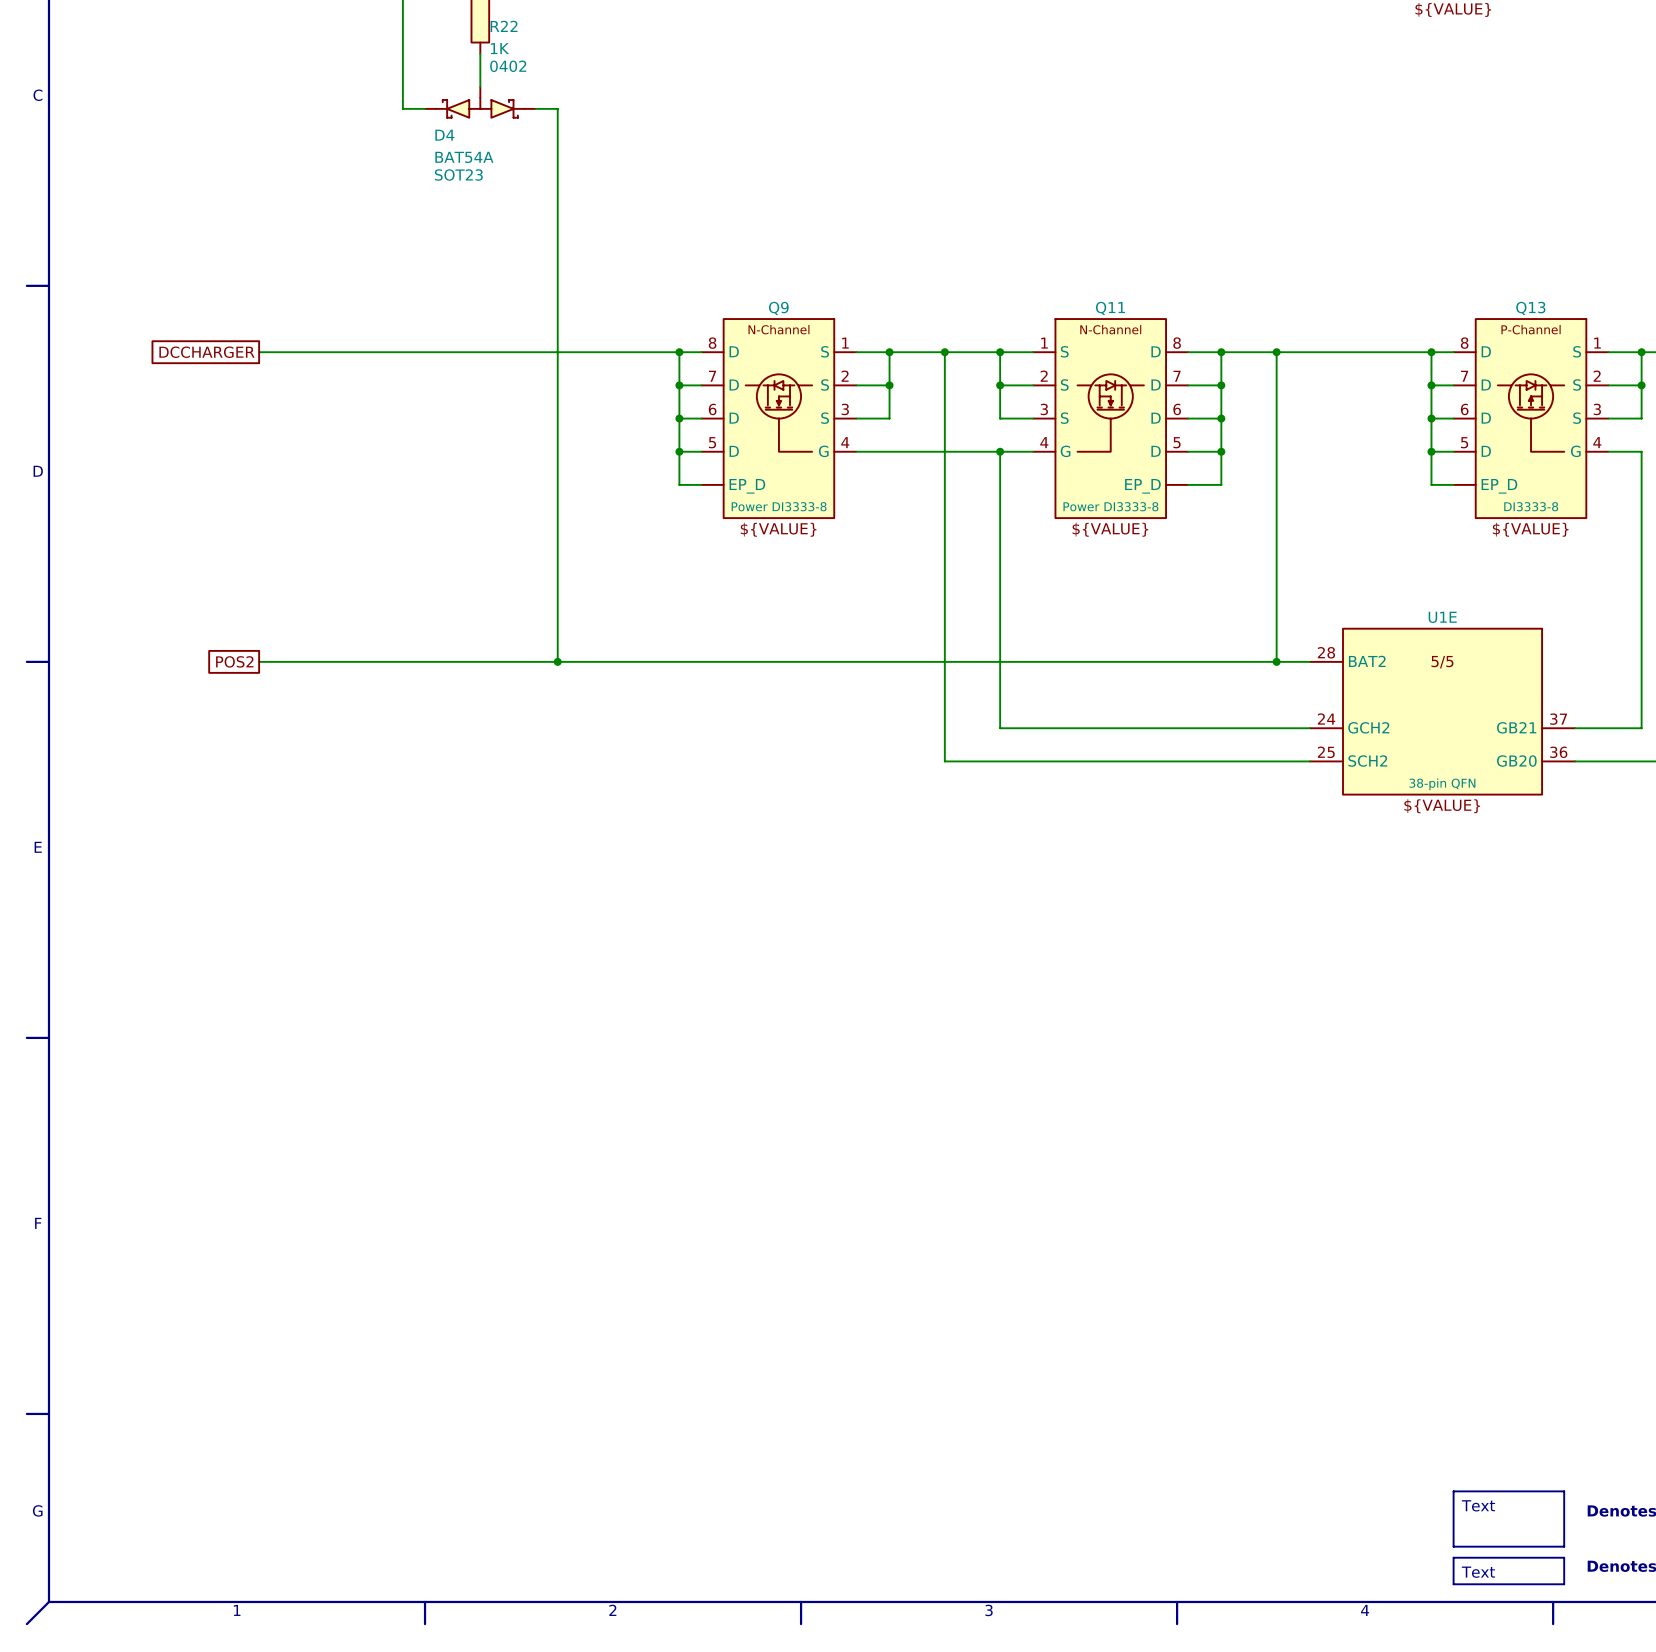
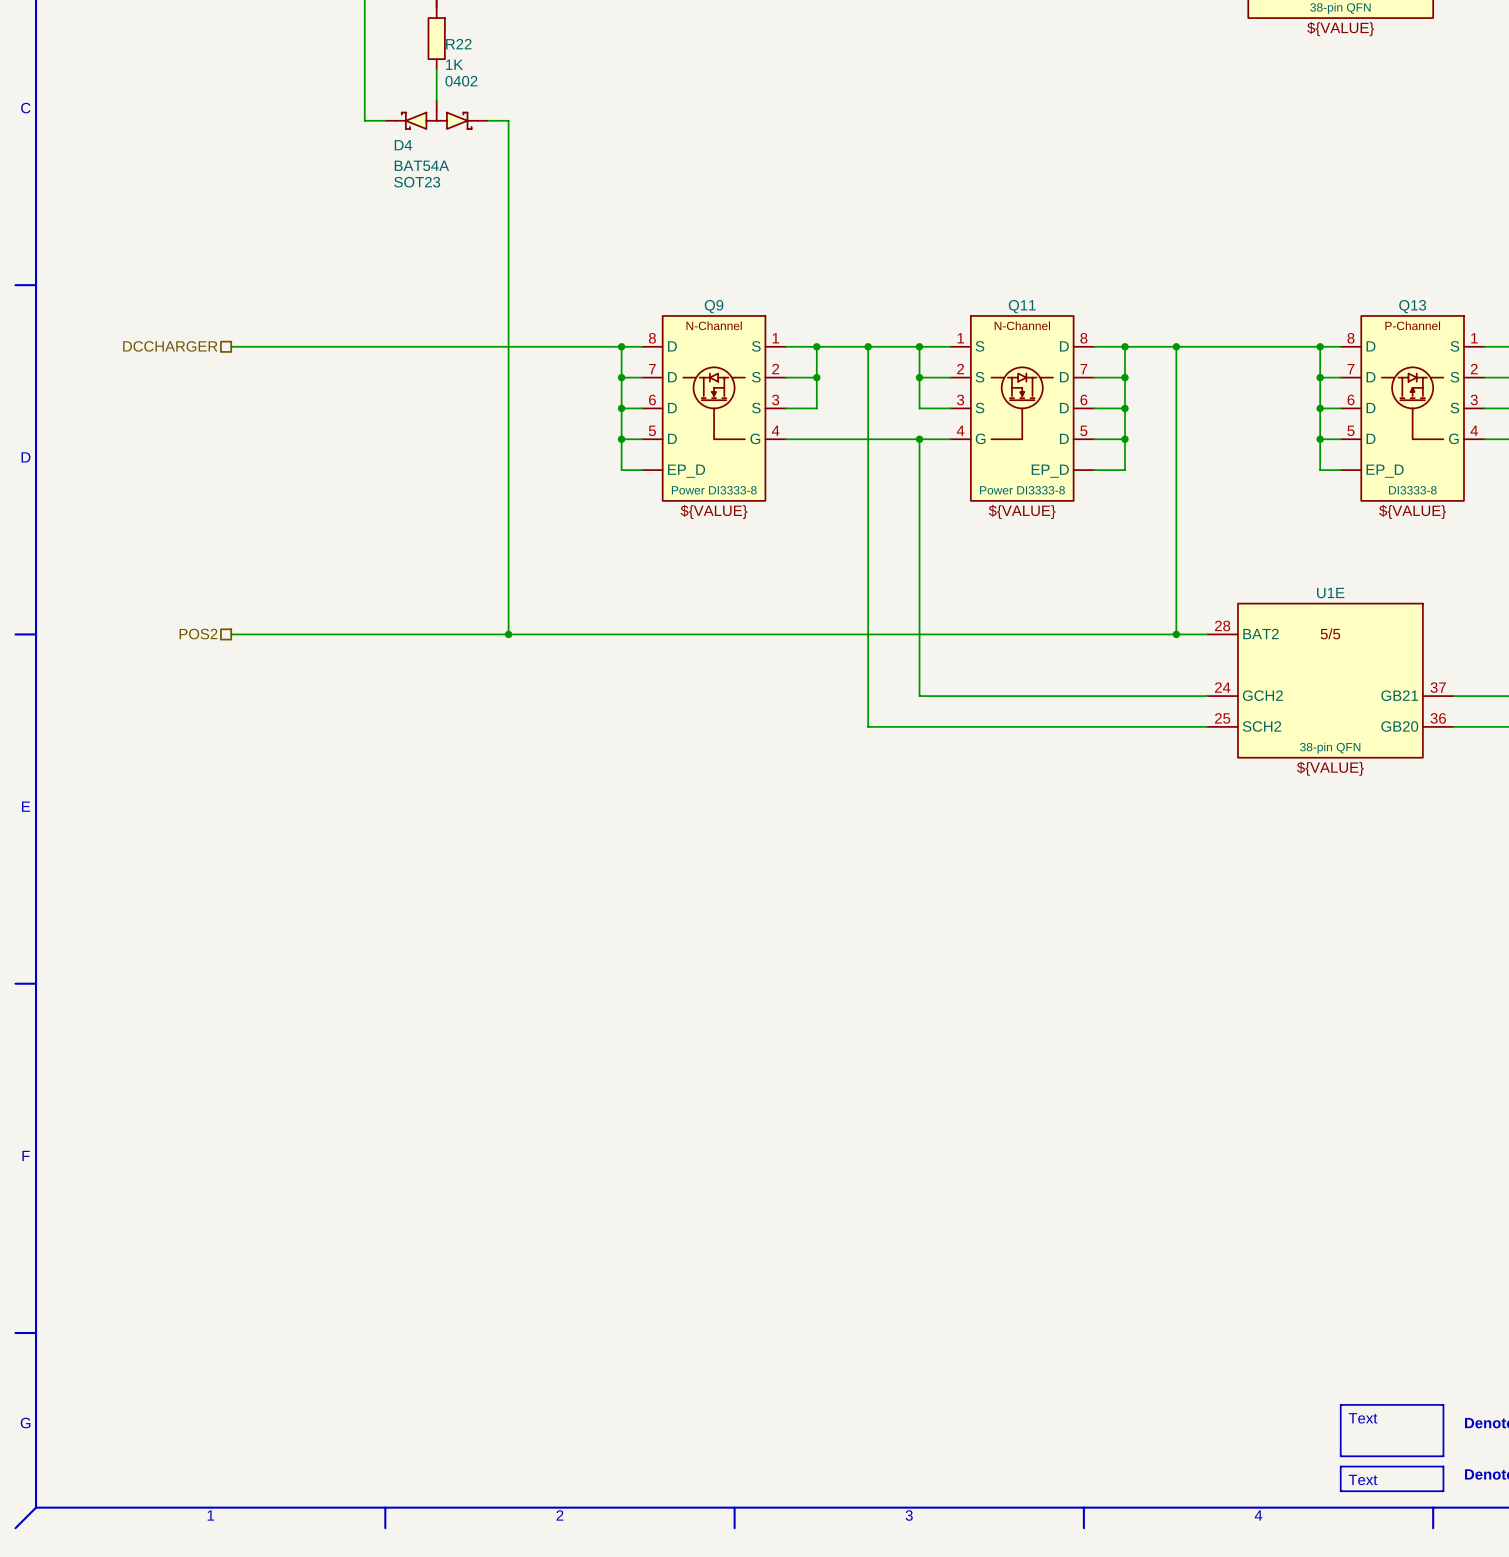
hierarchical label: none -> DCCHARGER (170, 346)
global label: DCCHARGER (206, 352) -> none
hierarchical label: none -> POS2 (198, 634)
global label: POS2 (234, 661) -> none

